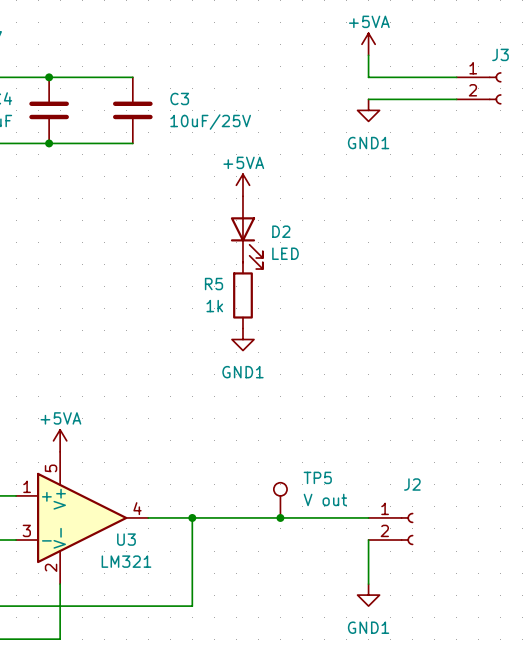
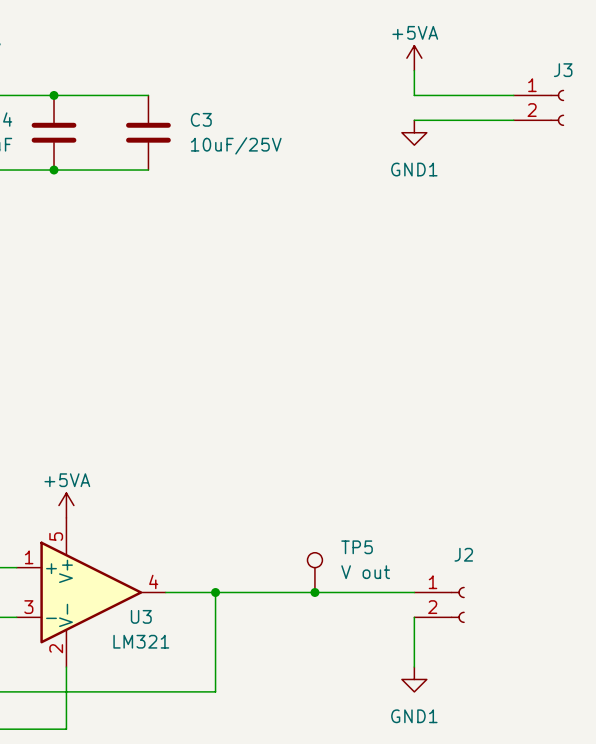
power symbol: +5VA (242, 185) -> none
D2: LED (246, 232) -> none
R5: 1k (242, 295) -> none
power symbol: GND1 (242, 339) -> none

